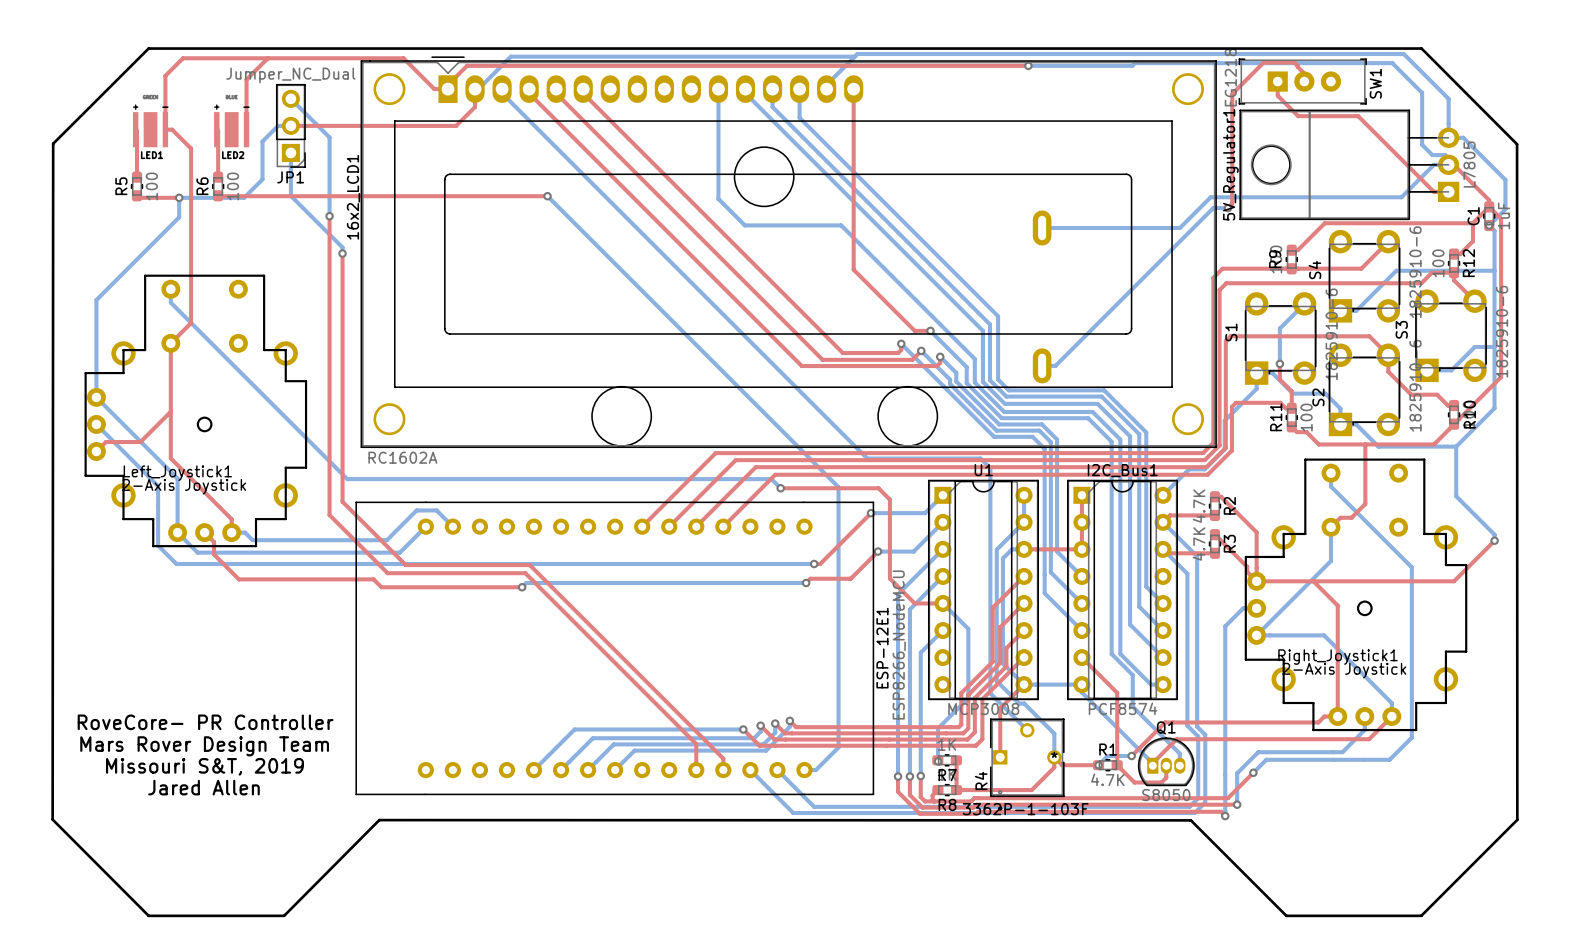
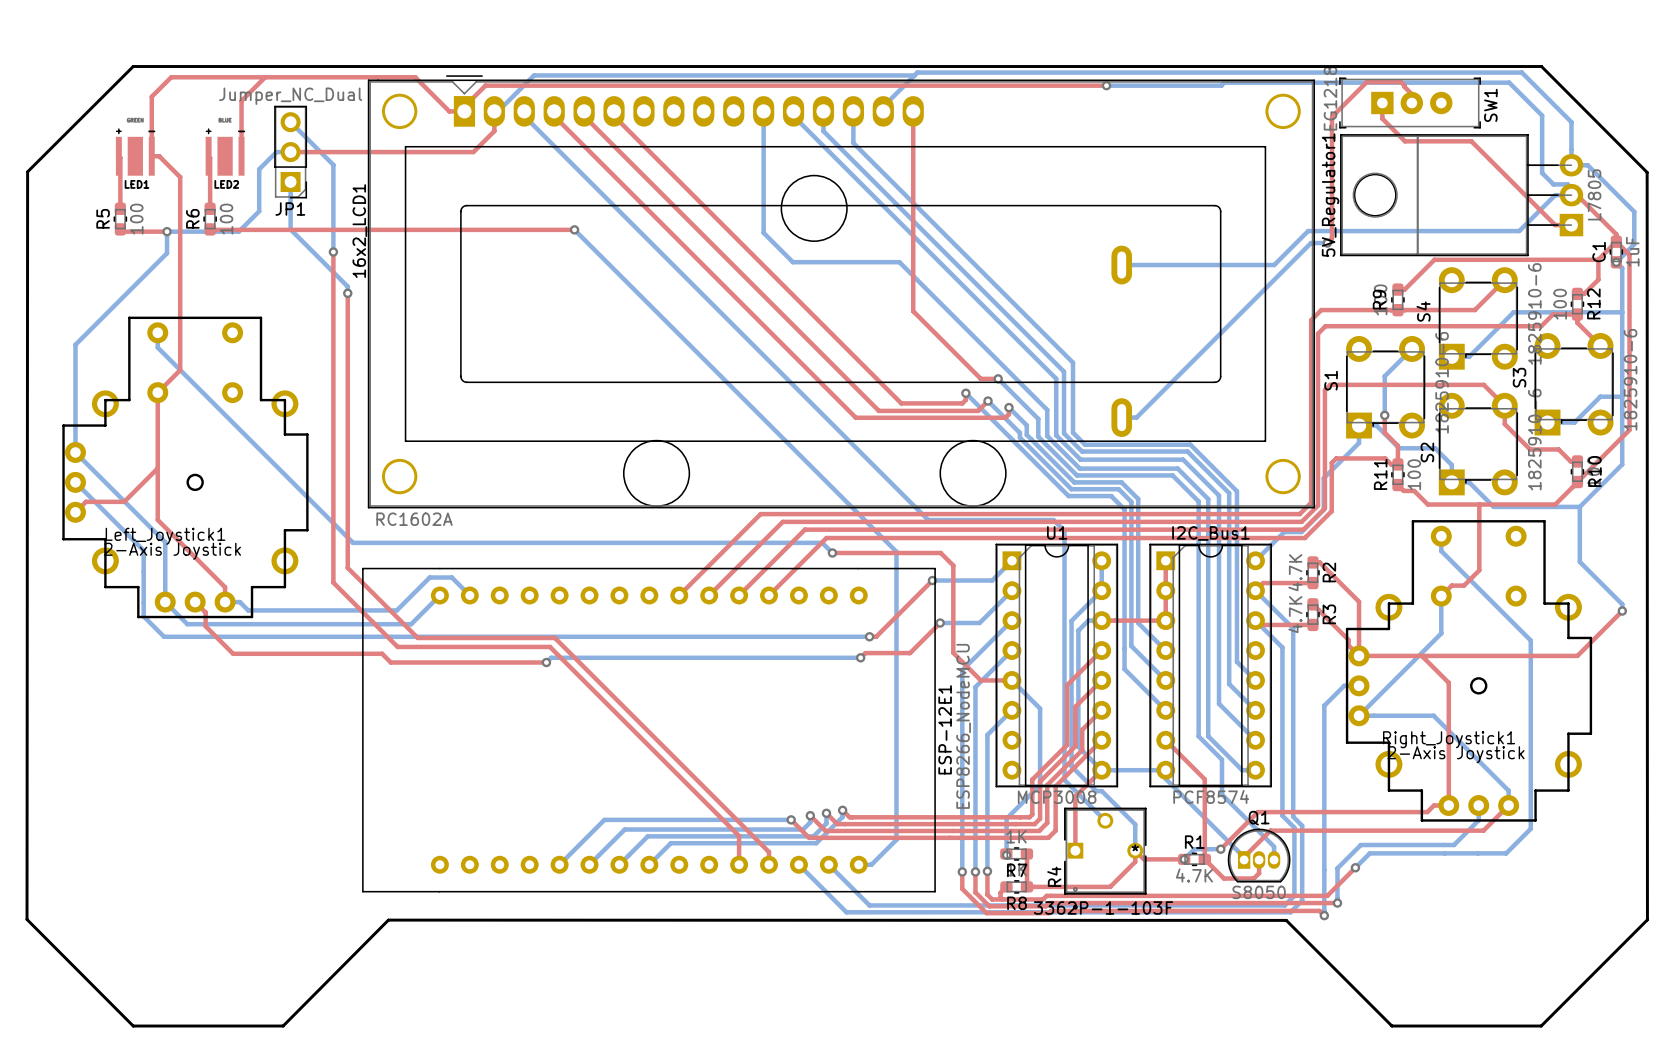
text: RoveCore- PR Controller (205, 722) -> none
text: Mars Rover Design Team (204, 746) -> none
text: Missouri S&T, 2019 (204, 766) -> none
text: Jared Allen (203, 787) -> none

